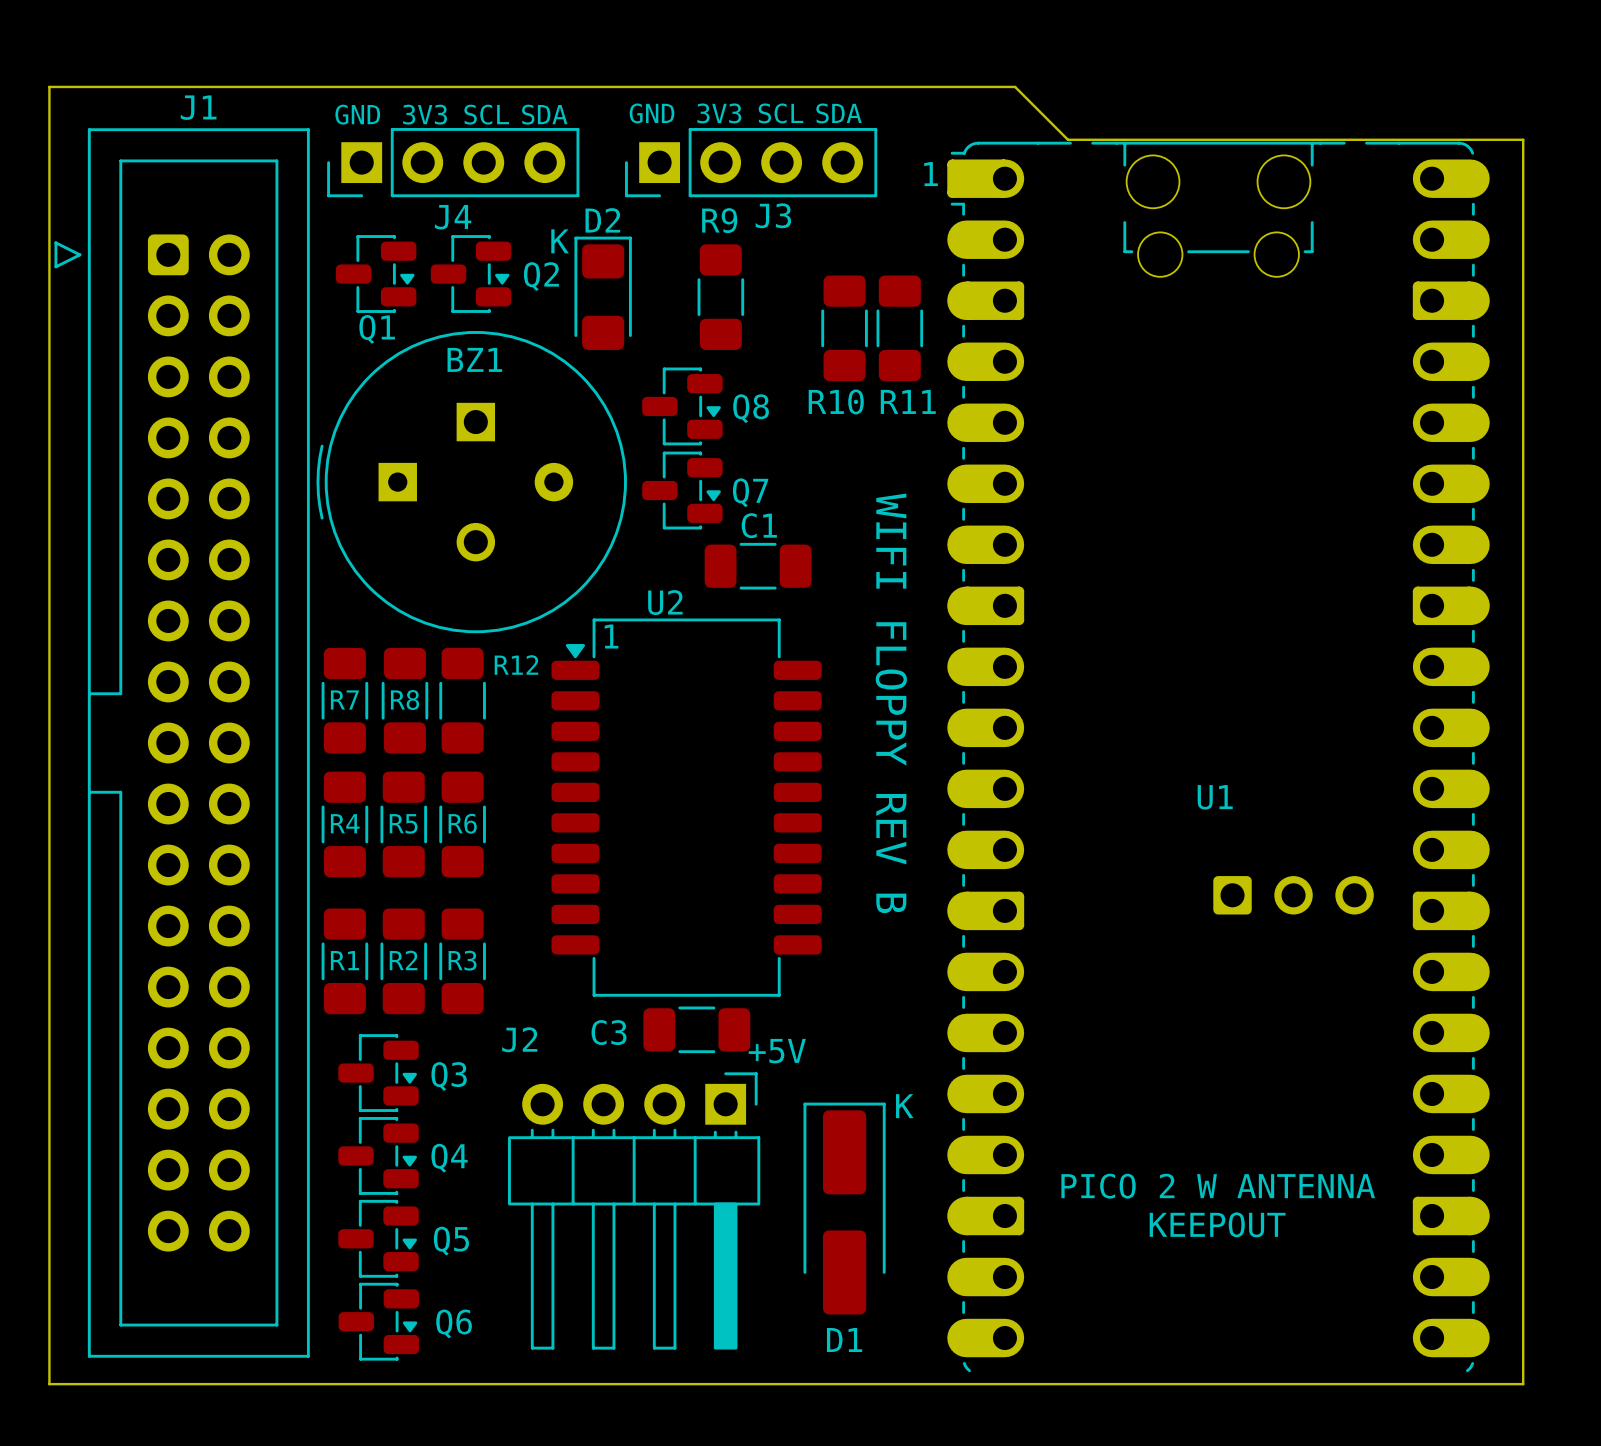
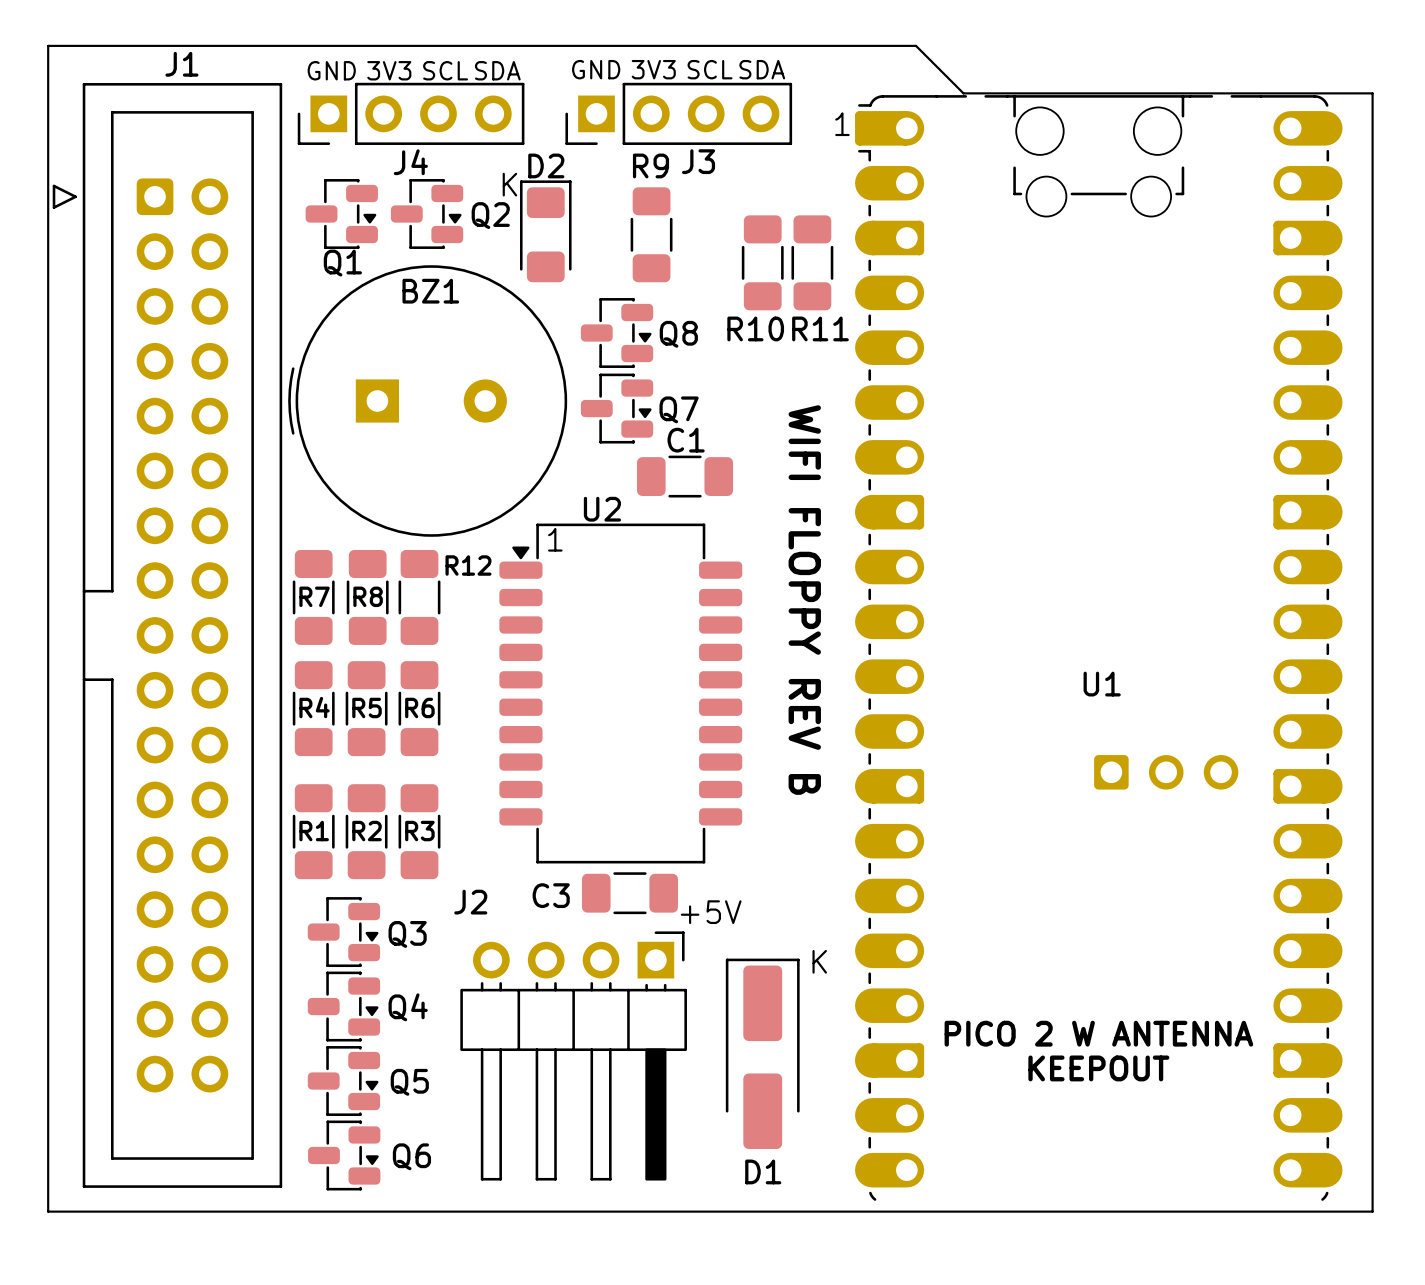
BZ1 footprint: [316, 331, 627, 634] -> [288, 265, 568, 537]

